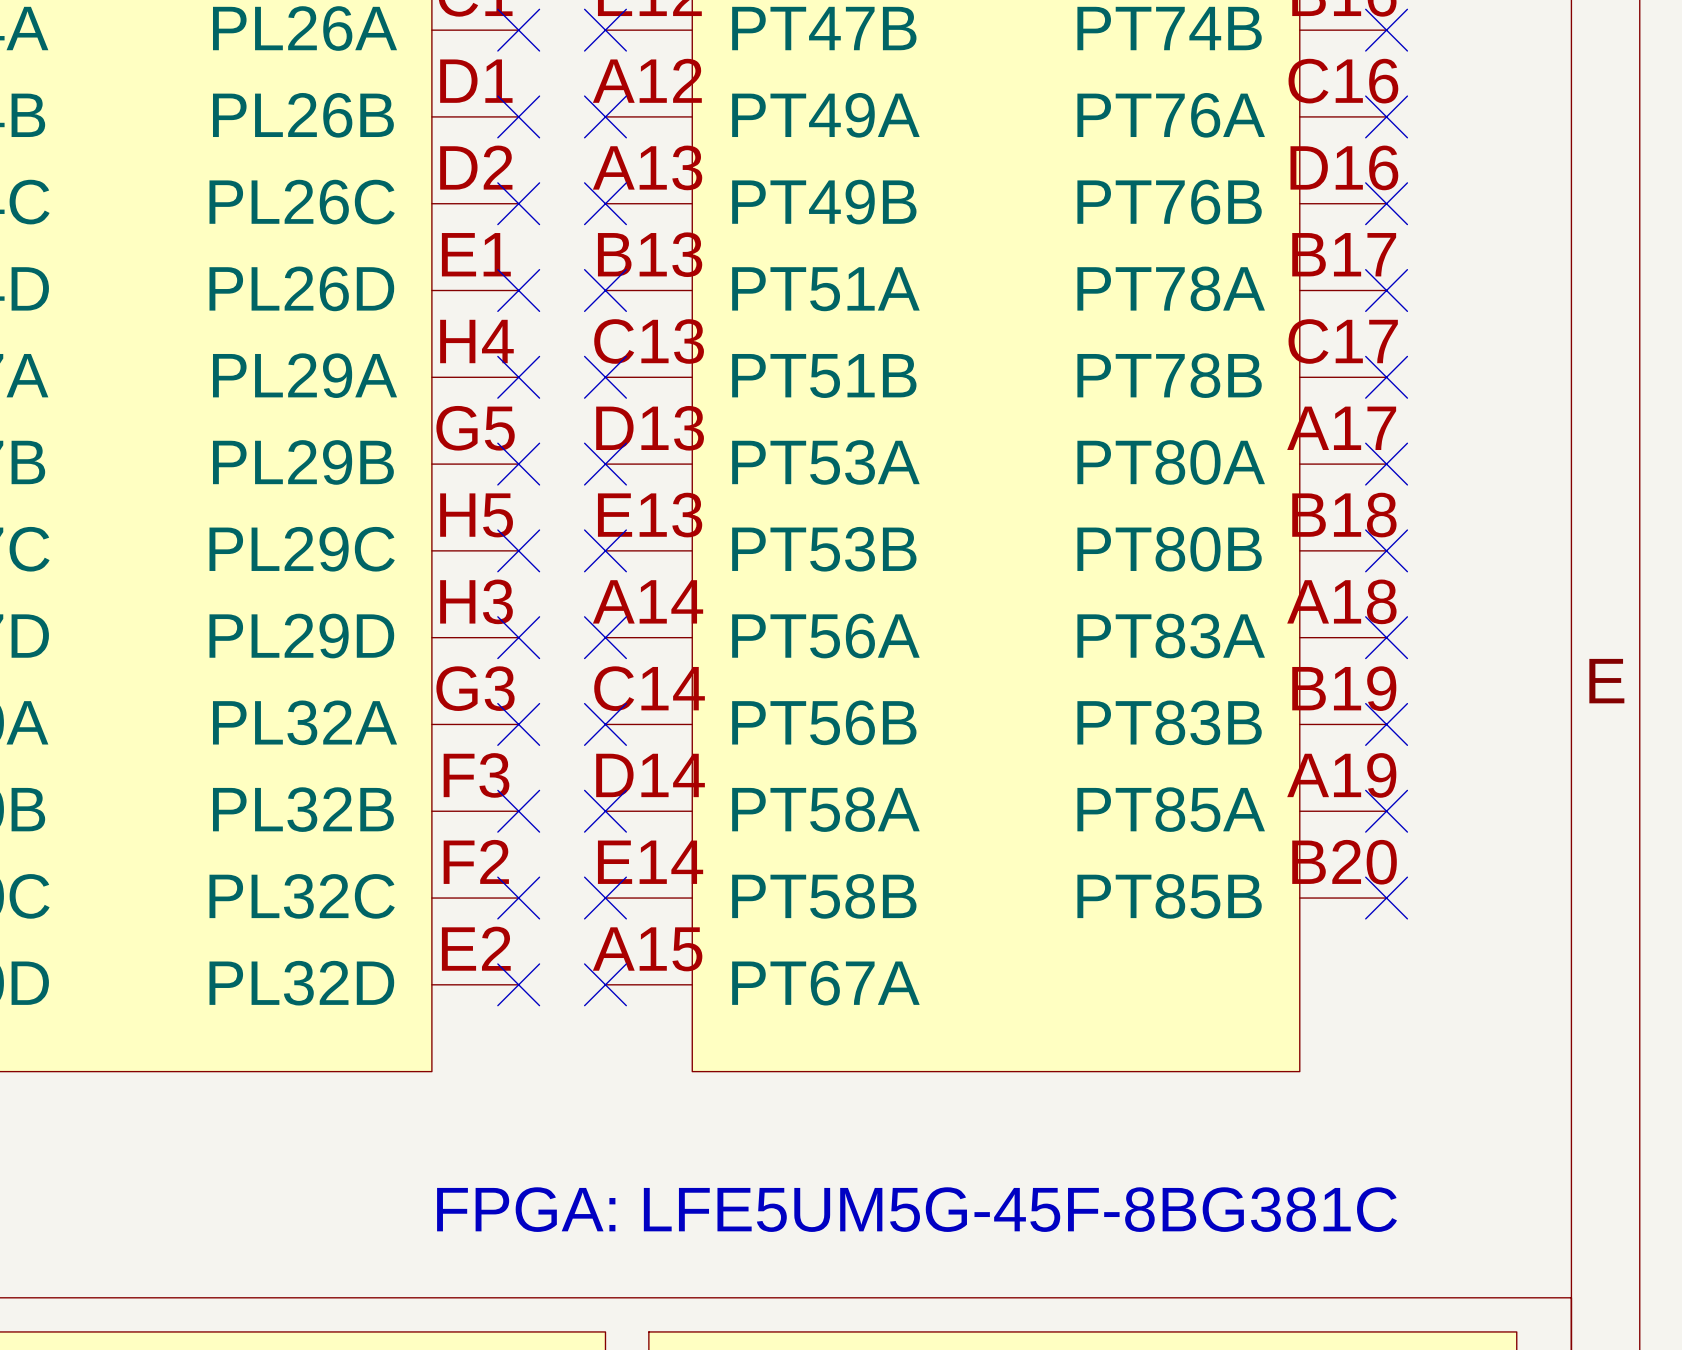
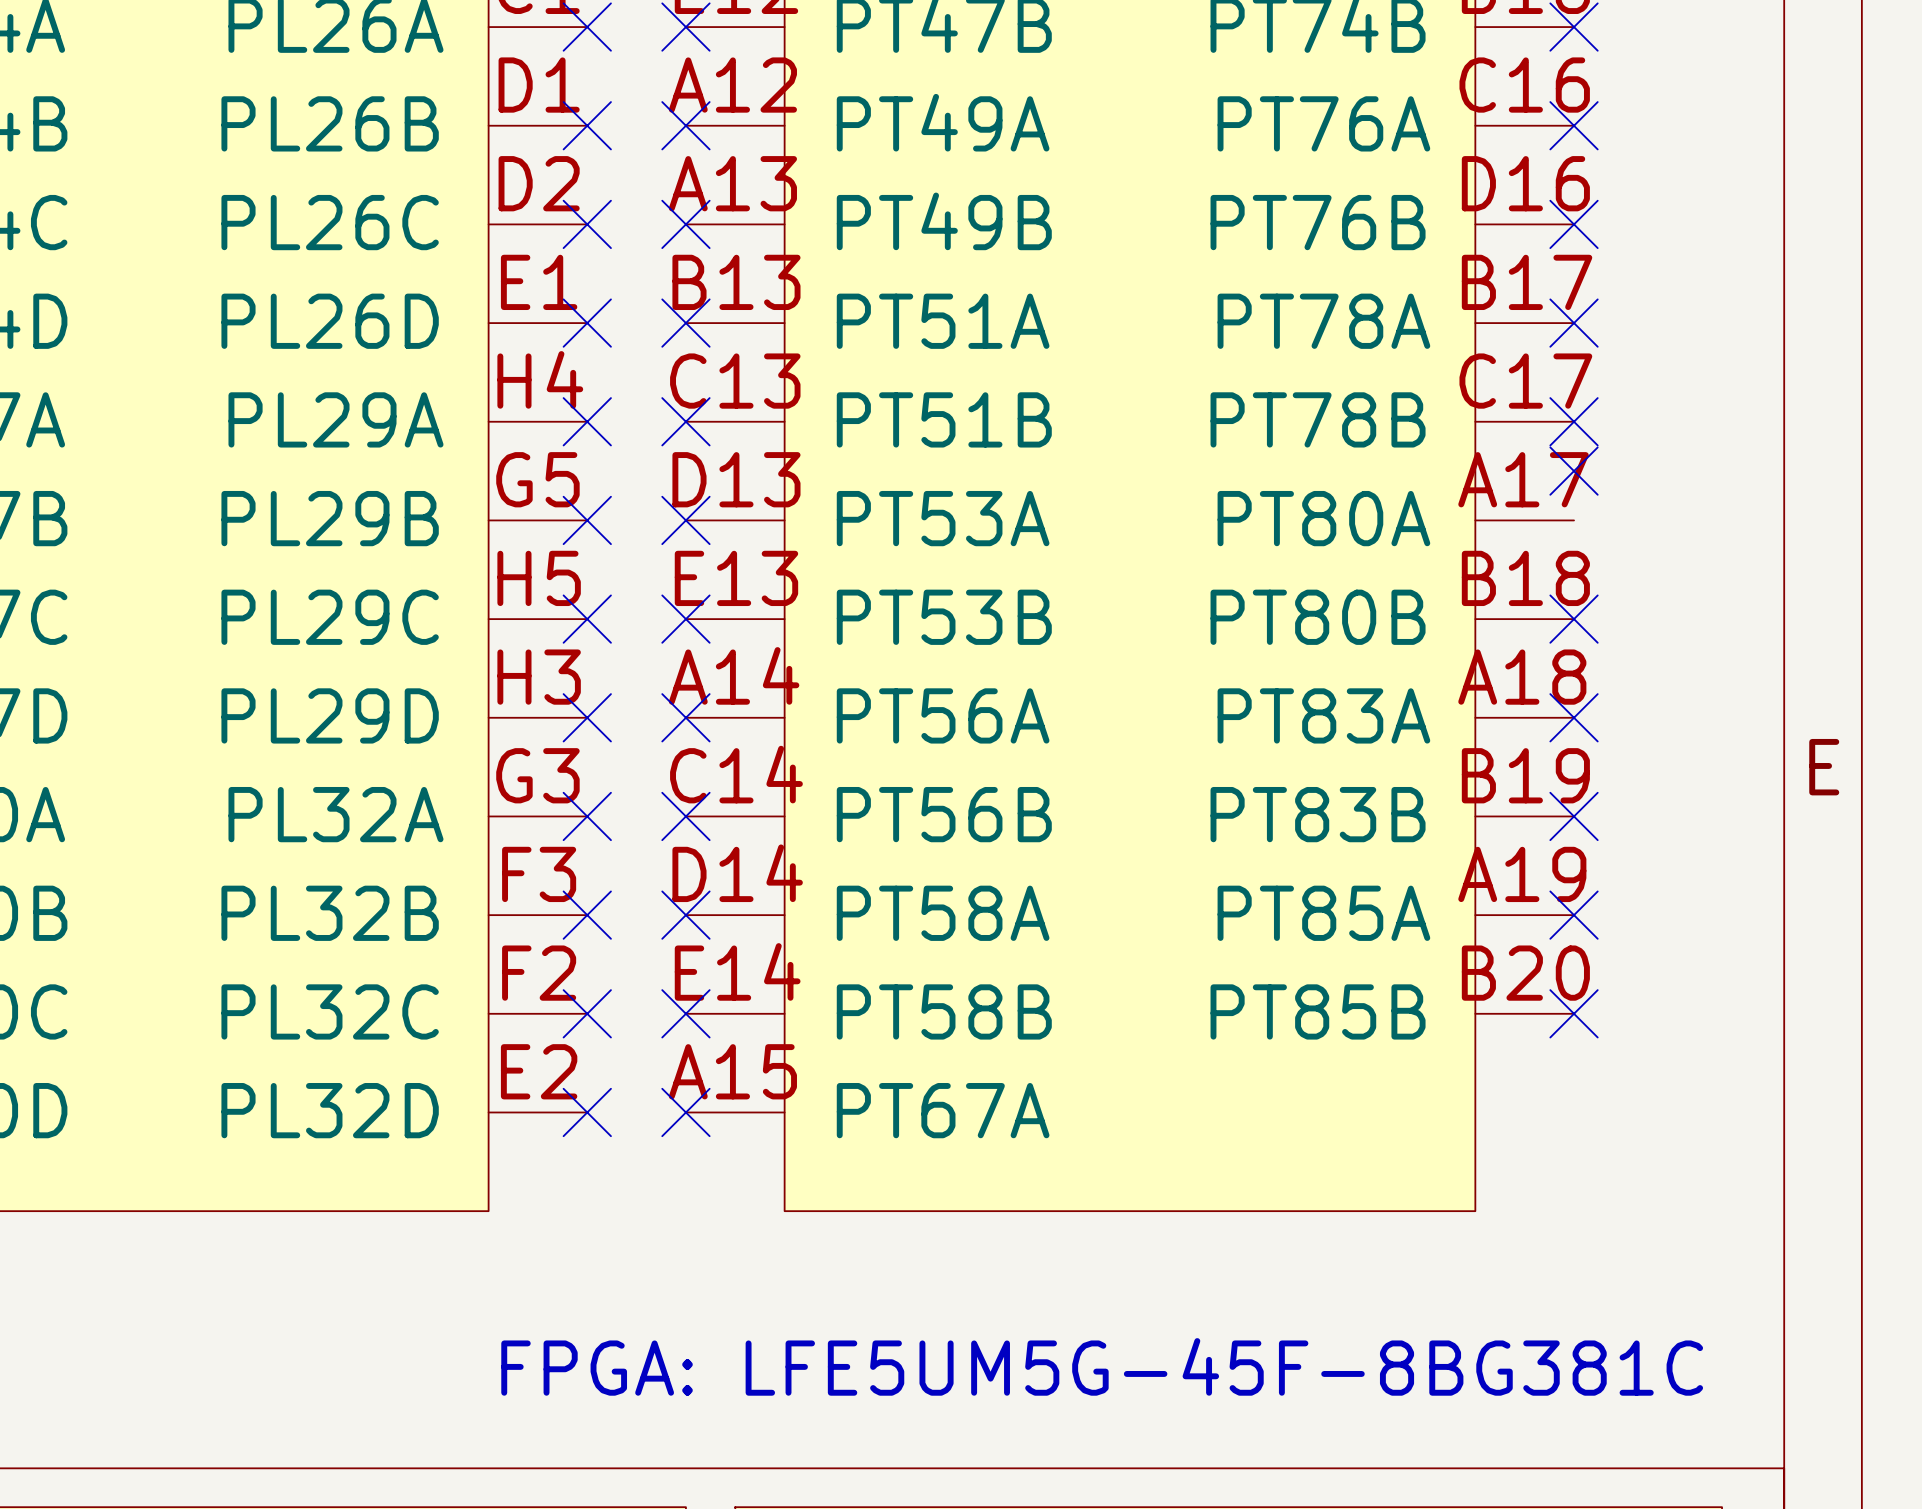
no-connect mark position: (1386, 464) -> (1574, 471)

